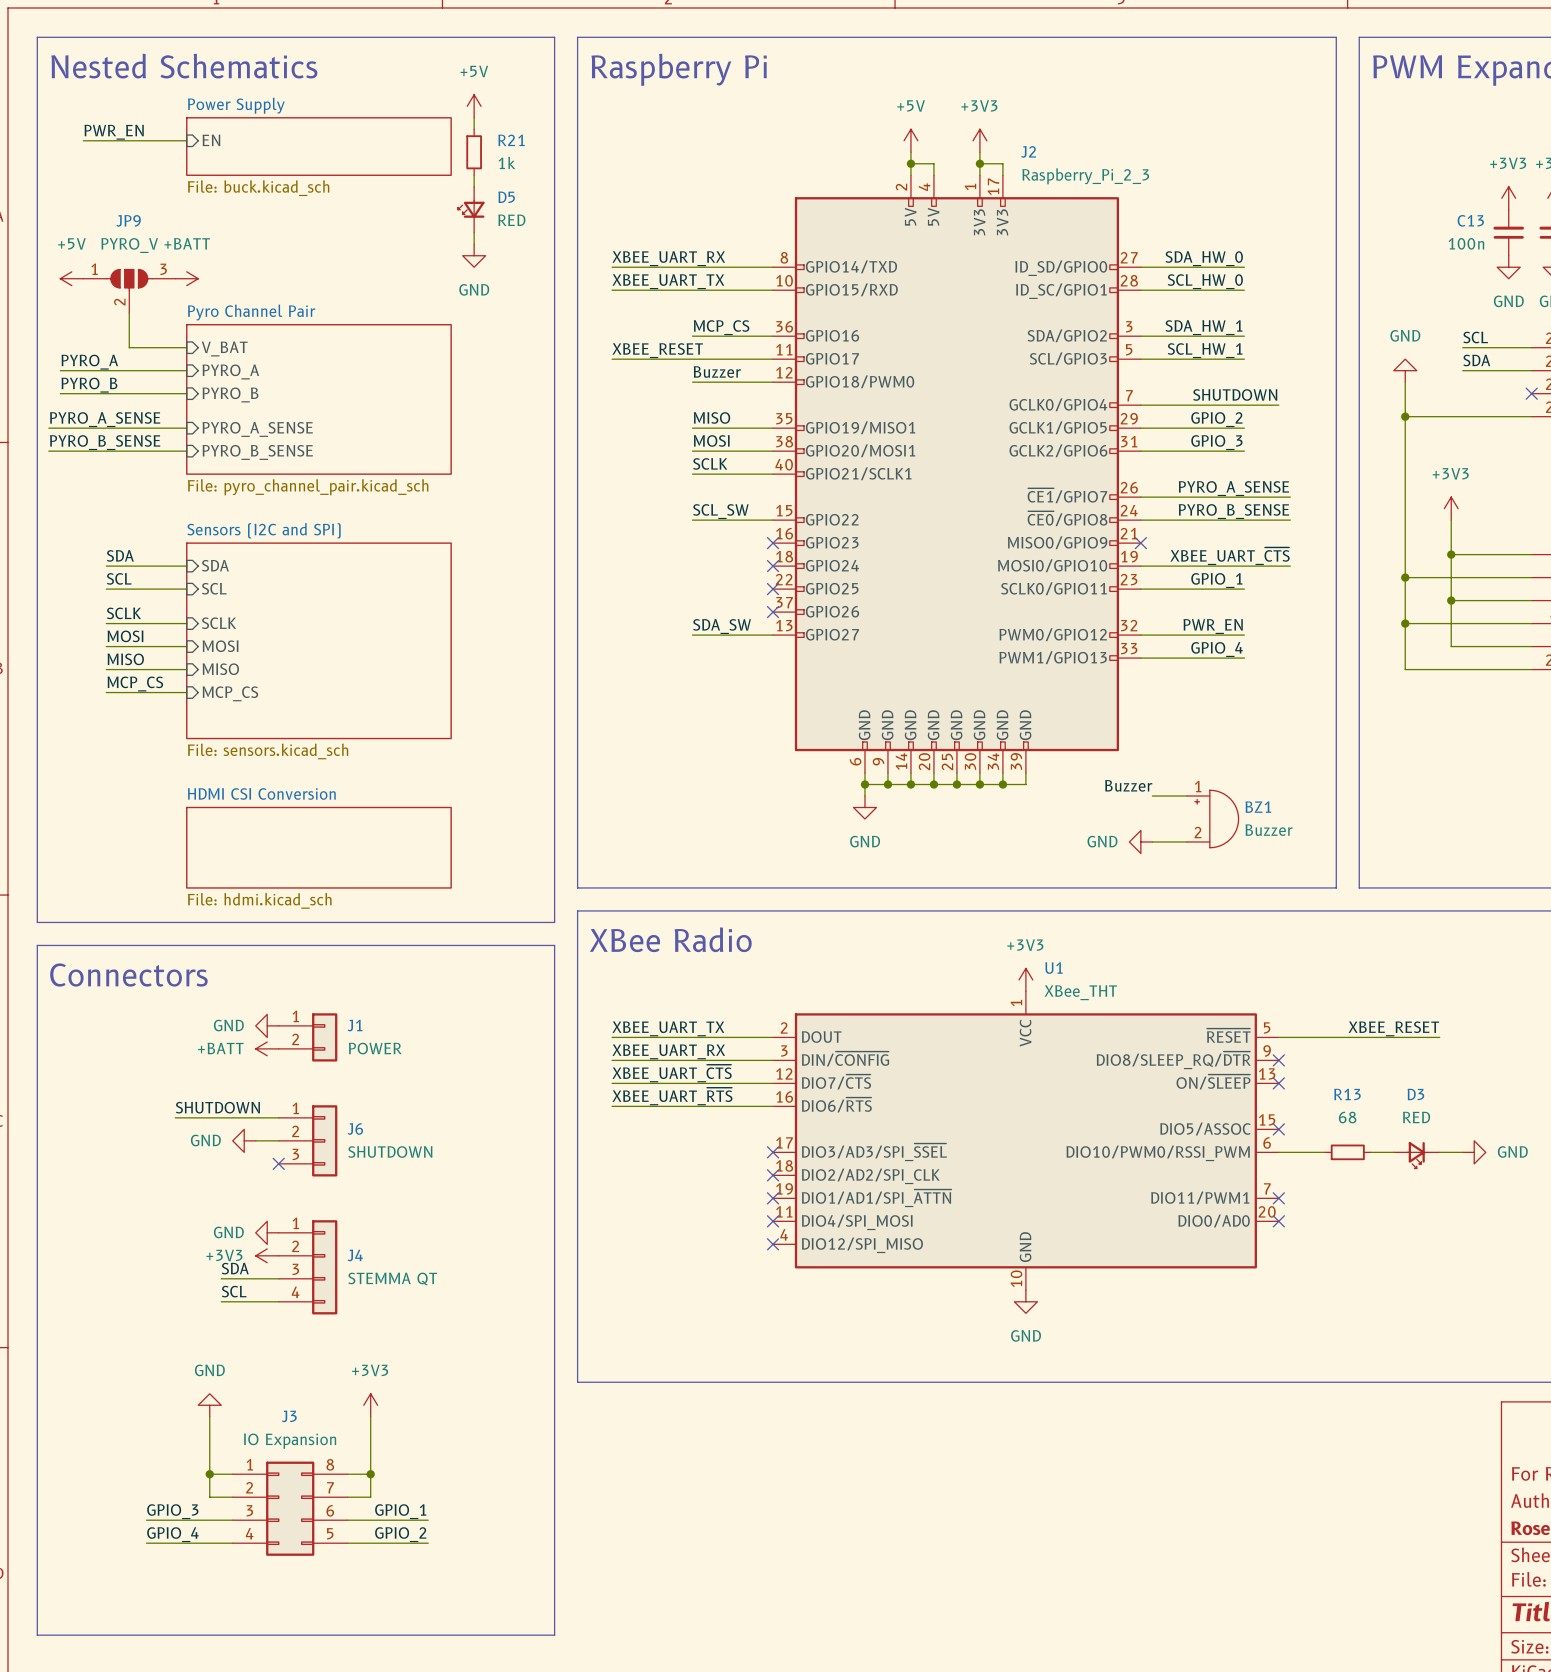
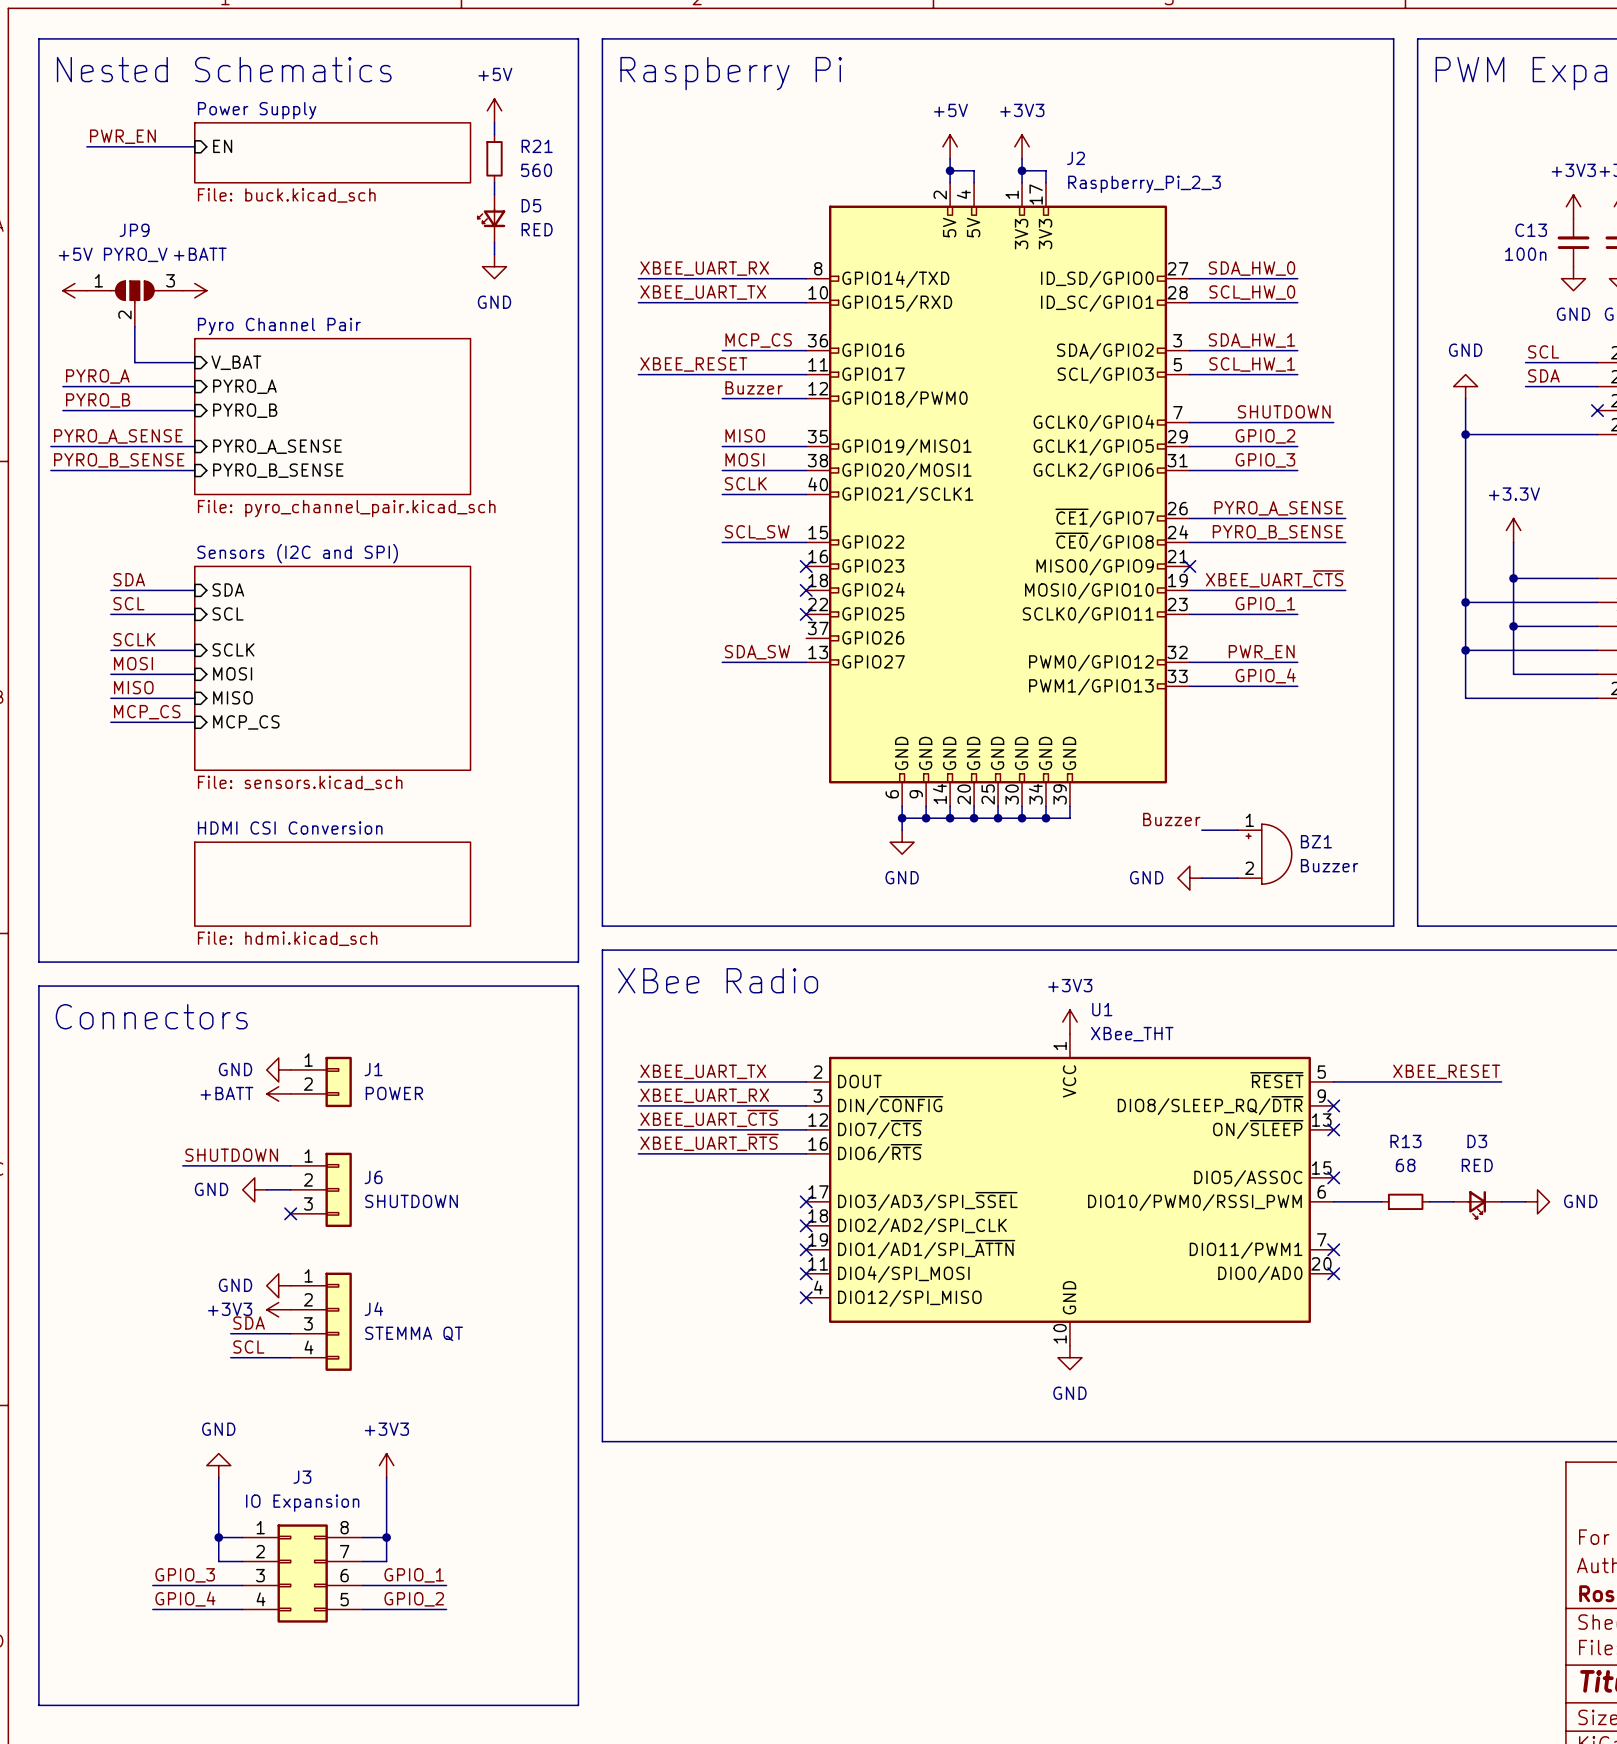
R21 value: 1k (506, 162) -> 560 (536, 170)
power symbol: +3V3 (1451, 508) -> +3.3V (1513, 530)
no-connect mark: (773, 612) -> none

